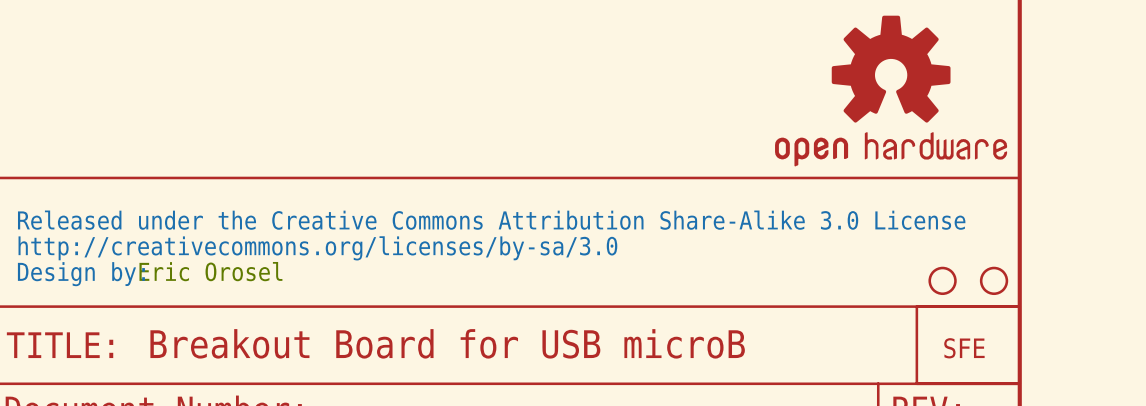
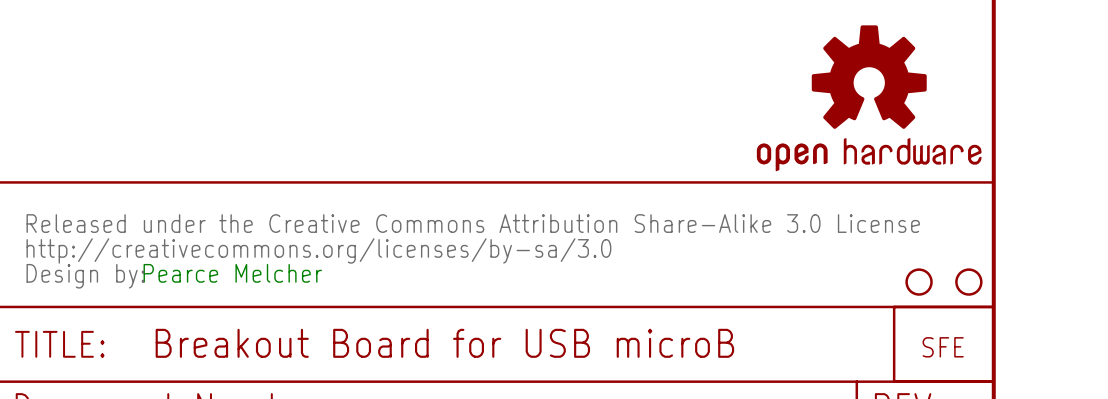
text: Eric Orosel (210, 271) -> Pearce Melcher (232, 273)

